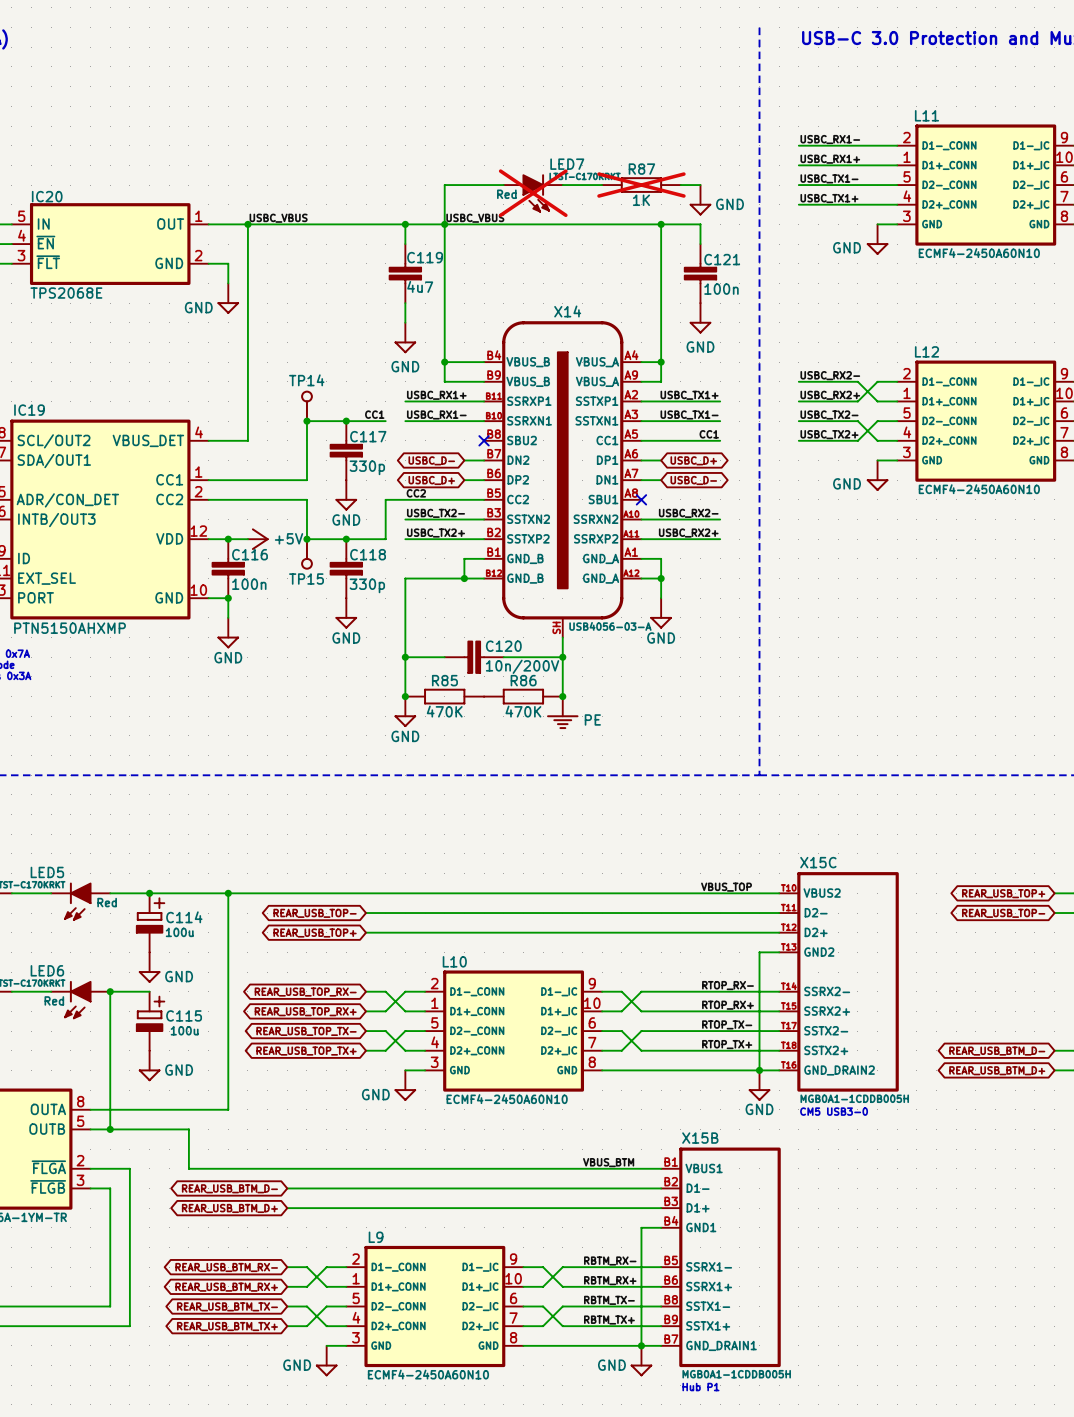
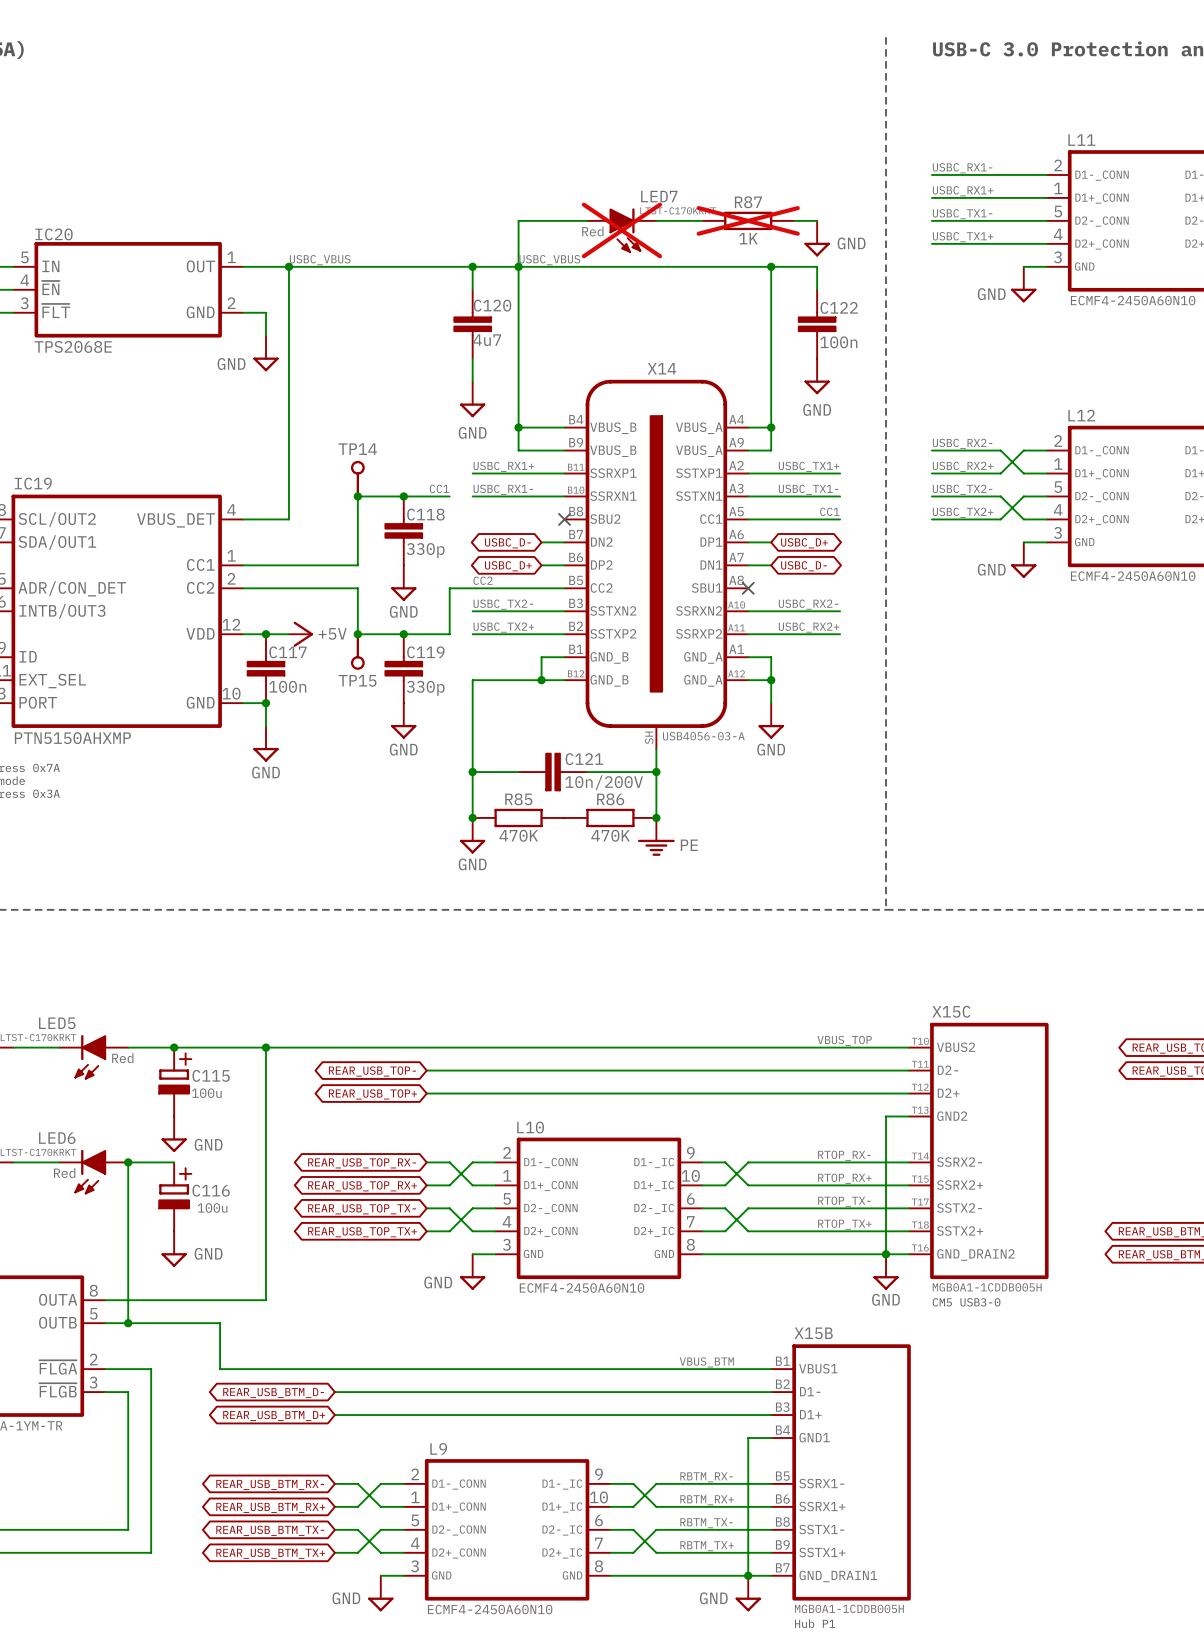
C119 name: C119 (425, 257) -> C120 (492, 305)
C121 name: C121 (722, 259) -> C122 (839, 307)
C117 name: C117 (368, 436) -> C118 (425, 514)
C116 name: C116 (250, 554) -> C117 (288, 652)
C118 name: C118 (368, 554) -> C119 (425, 652)
C120 name: C120 (503, 646) -> C121 (584, 759)
C114 name: C114 (184, 917) -> C115 (211, 1075)
C115 name: C115 (184, 1015) -> C116 (211, 1190)

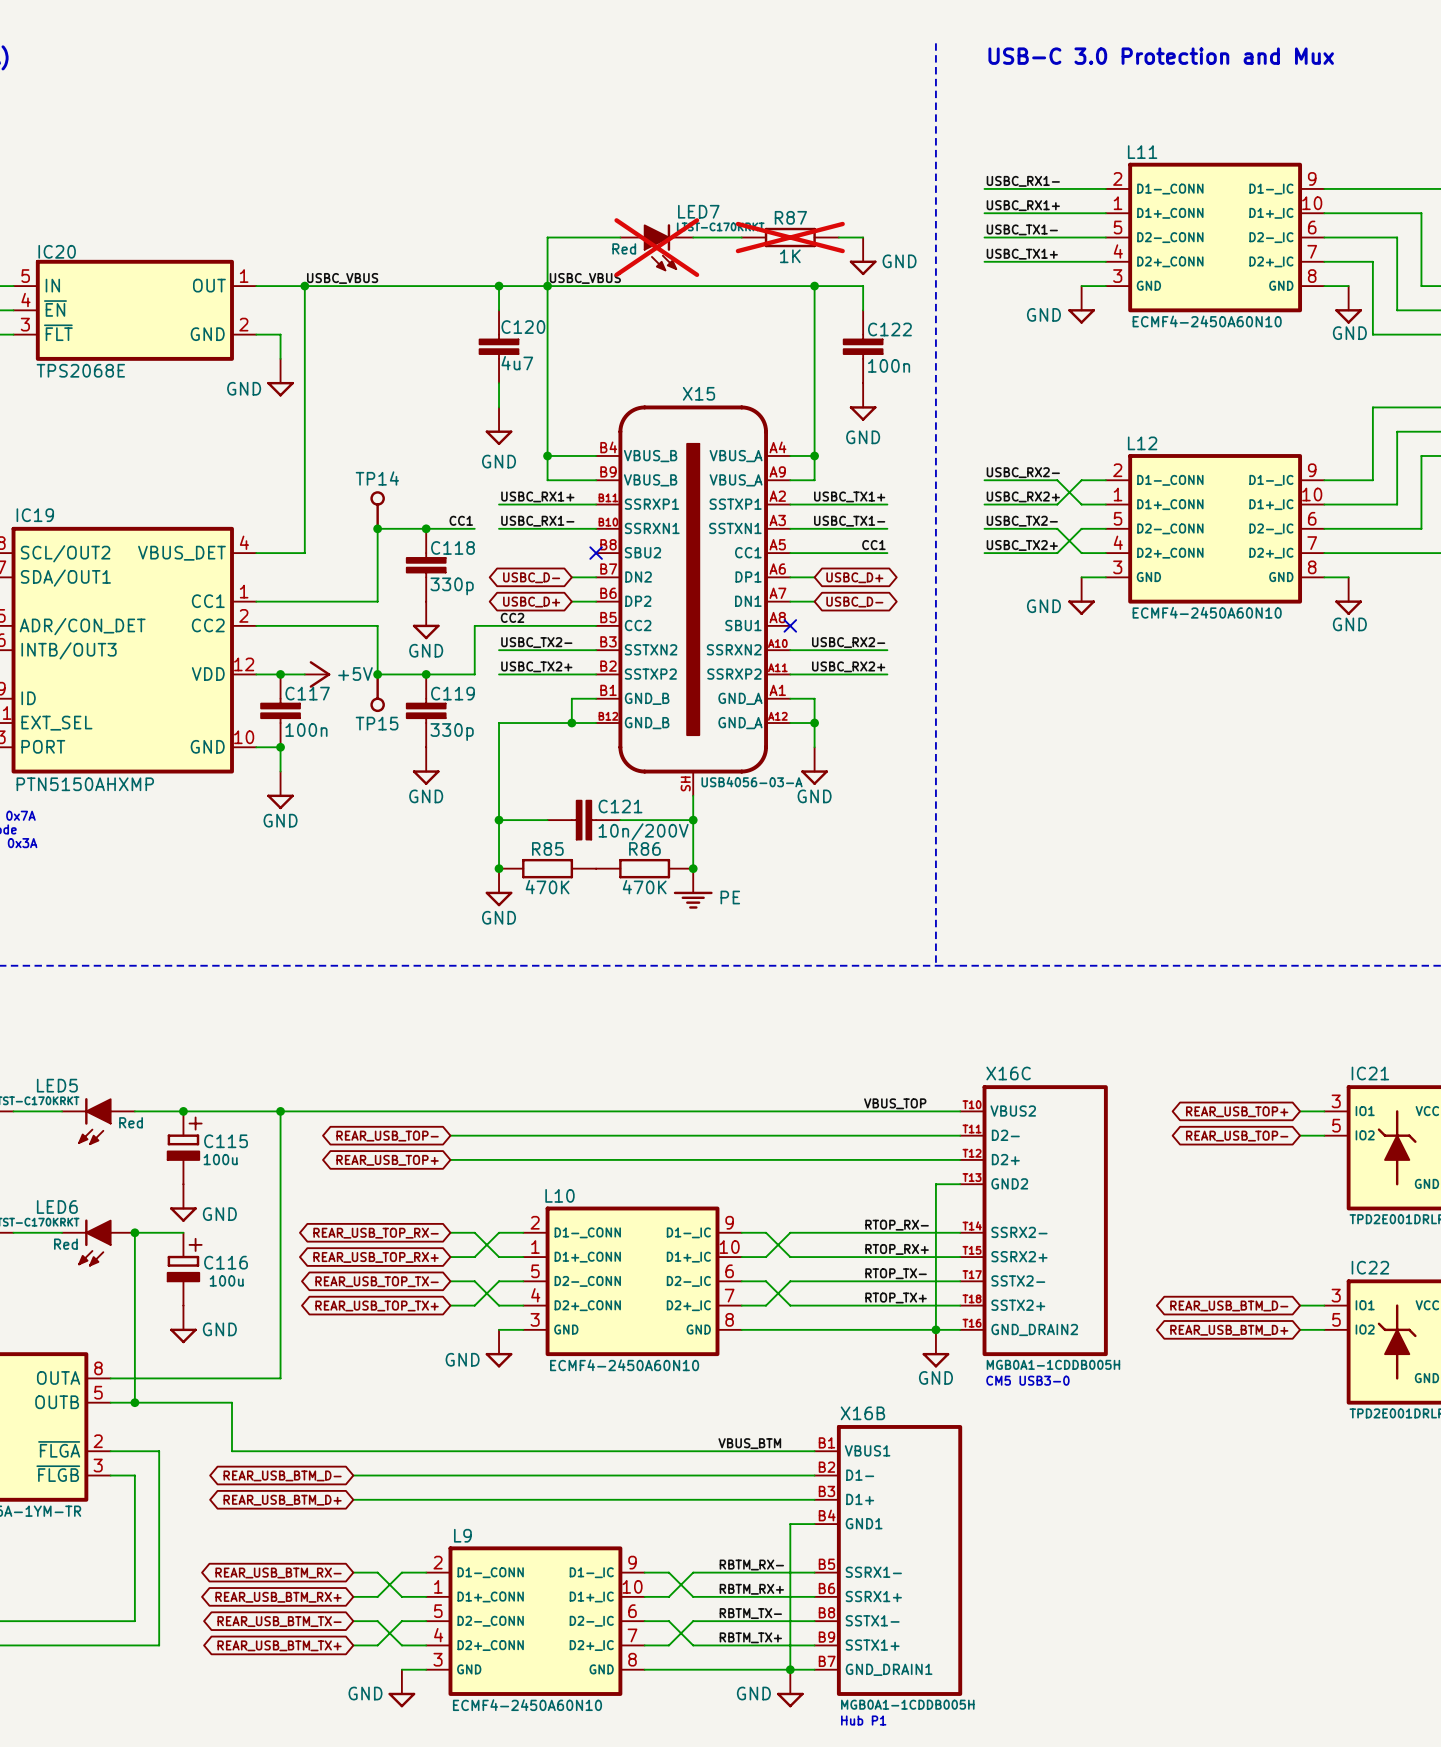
X14 name: X14 (662, 368) -> X15 (698, 393)
X15C name: X15C (951, 1011) -> X16C (1008, 1073)
X15B name: X15B (813, 1333) -> X16B (862, 1413)

